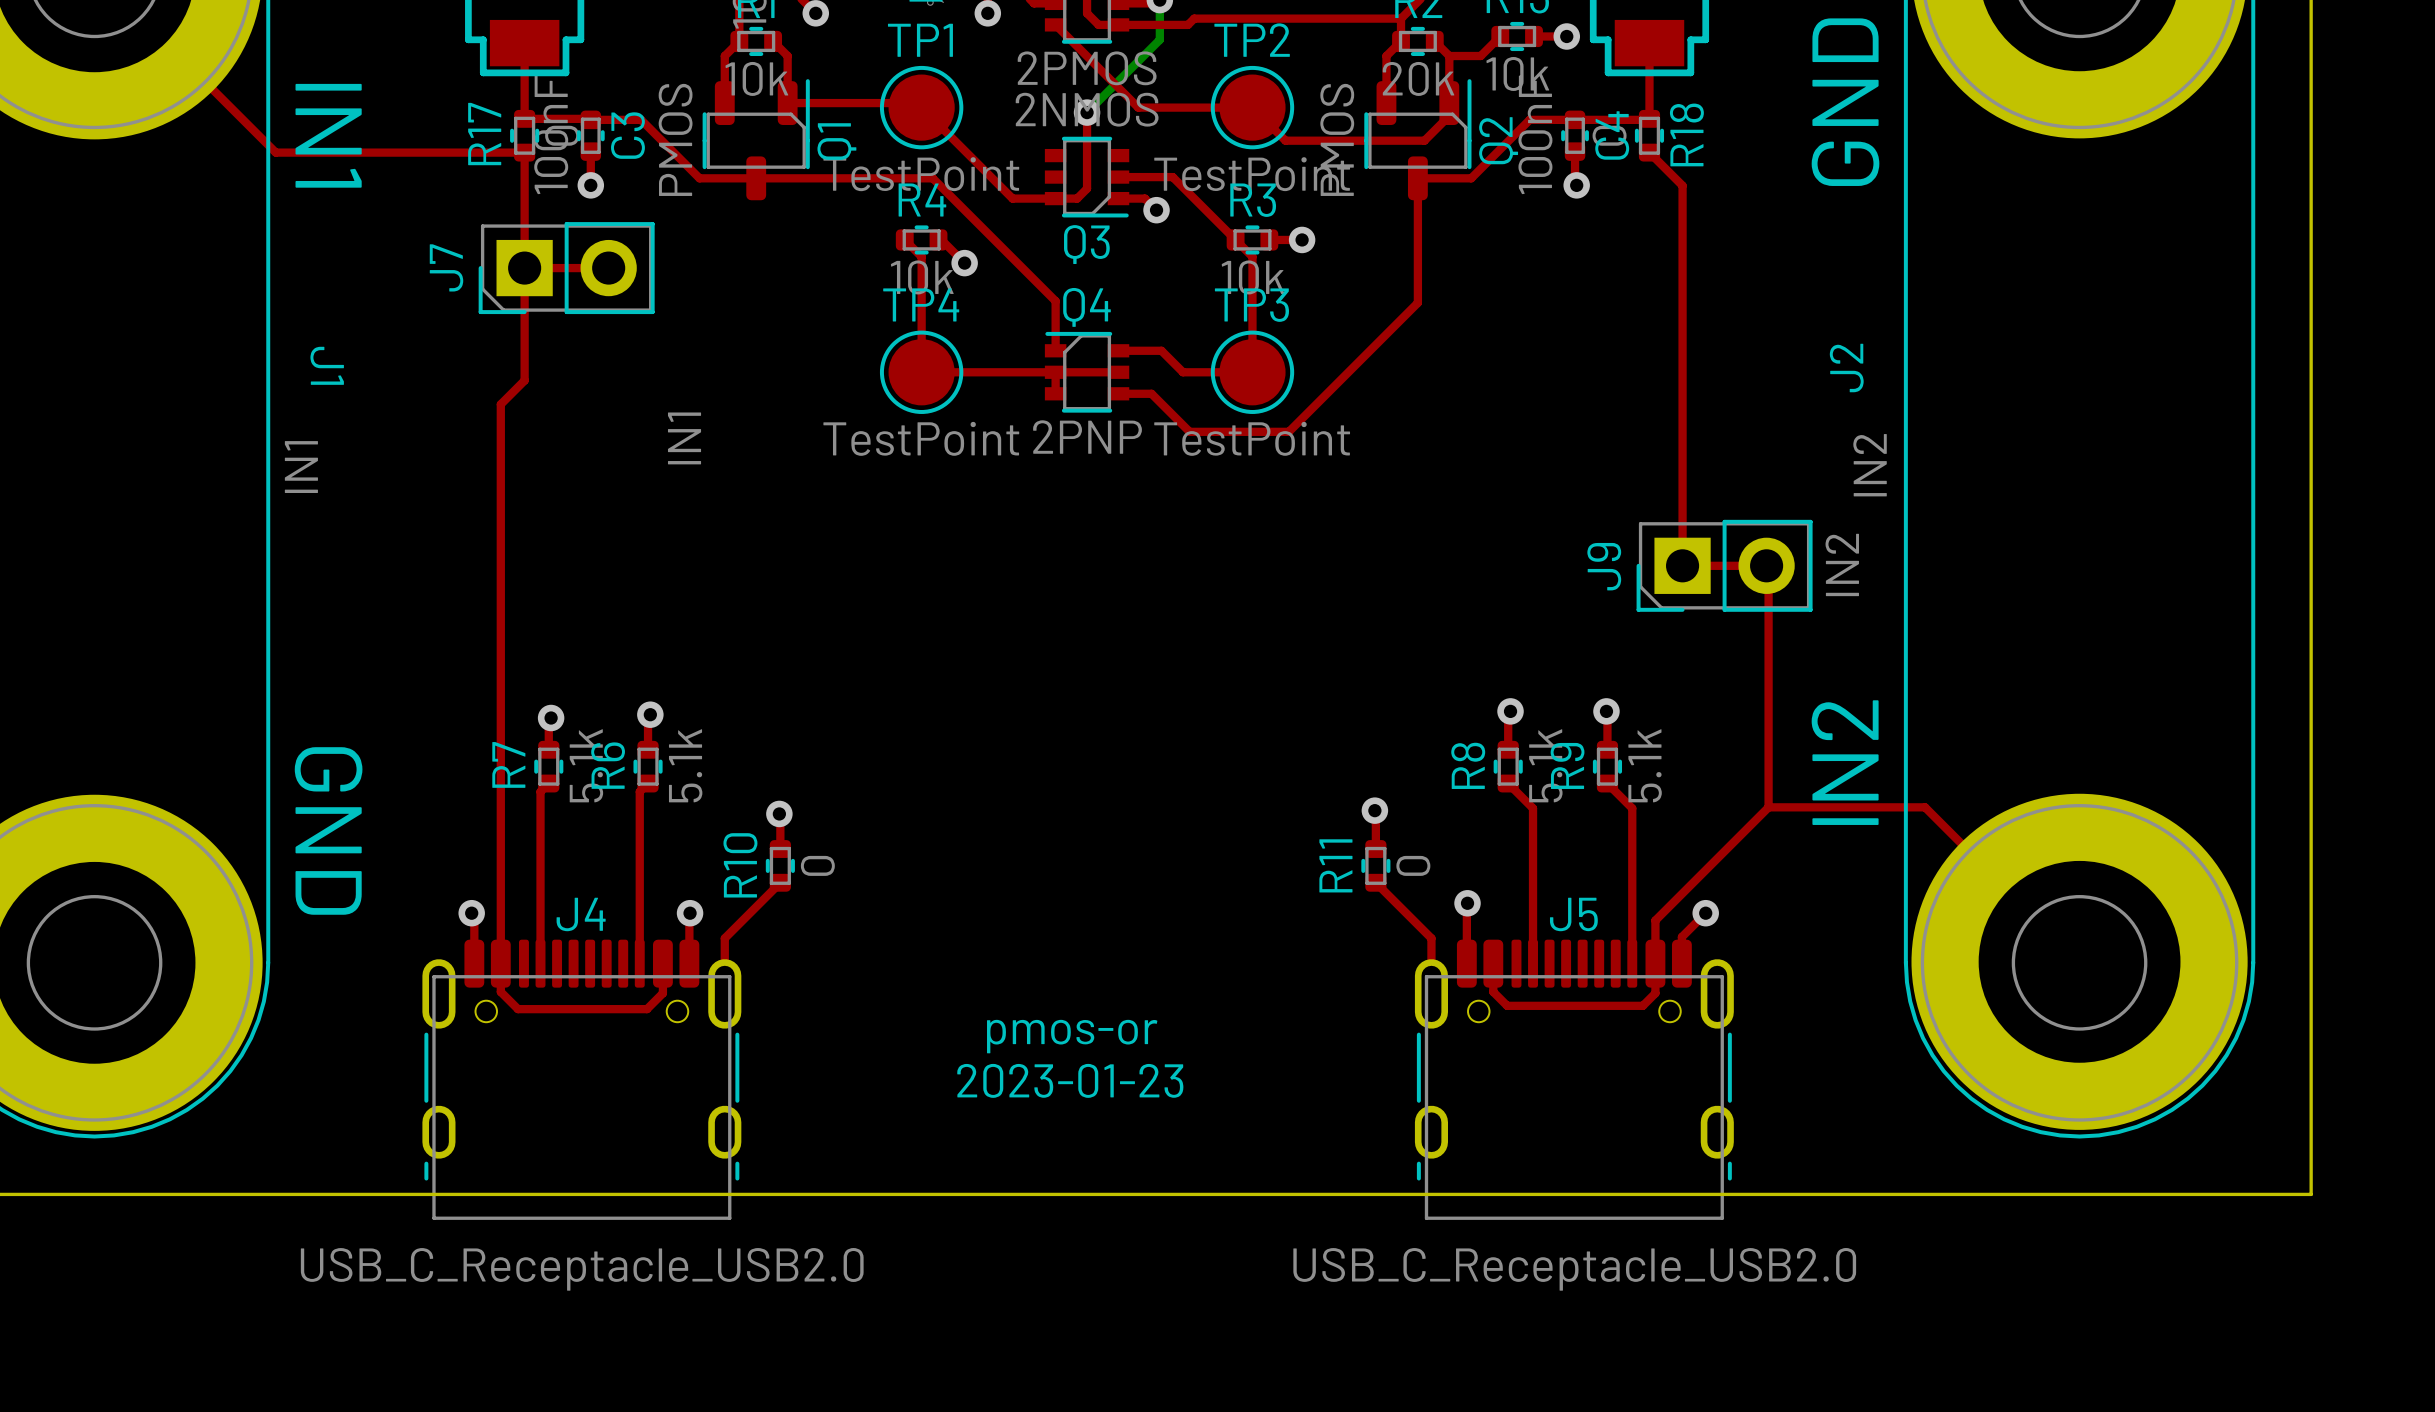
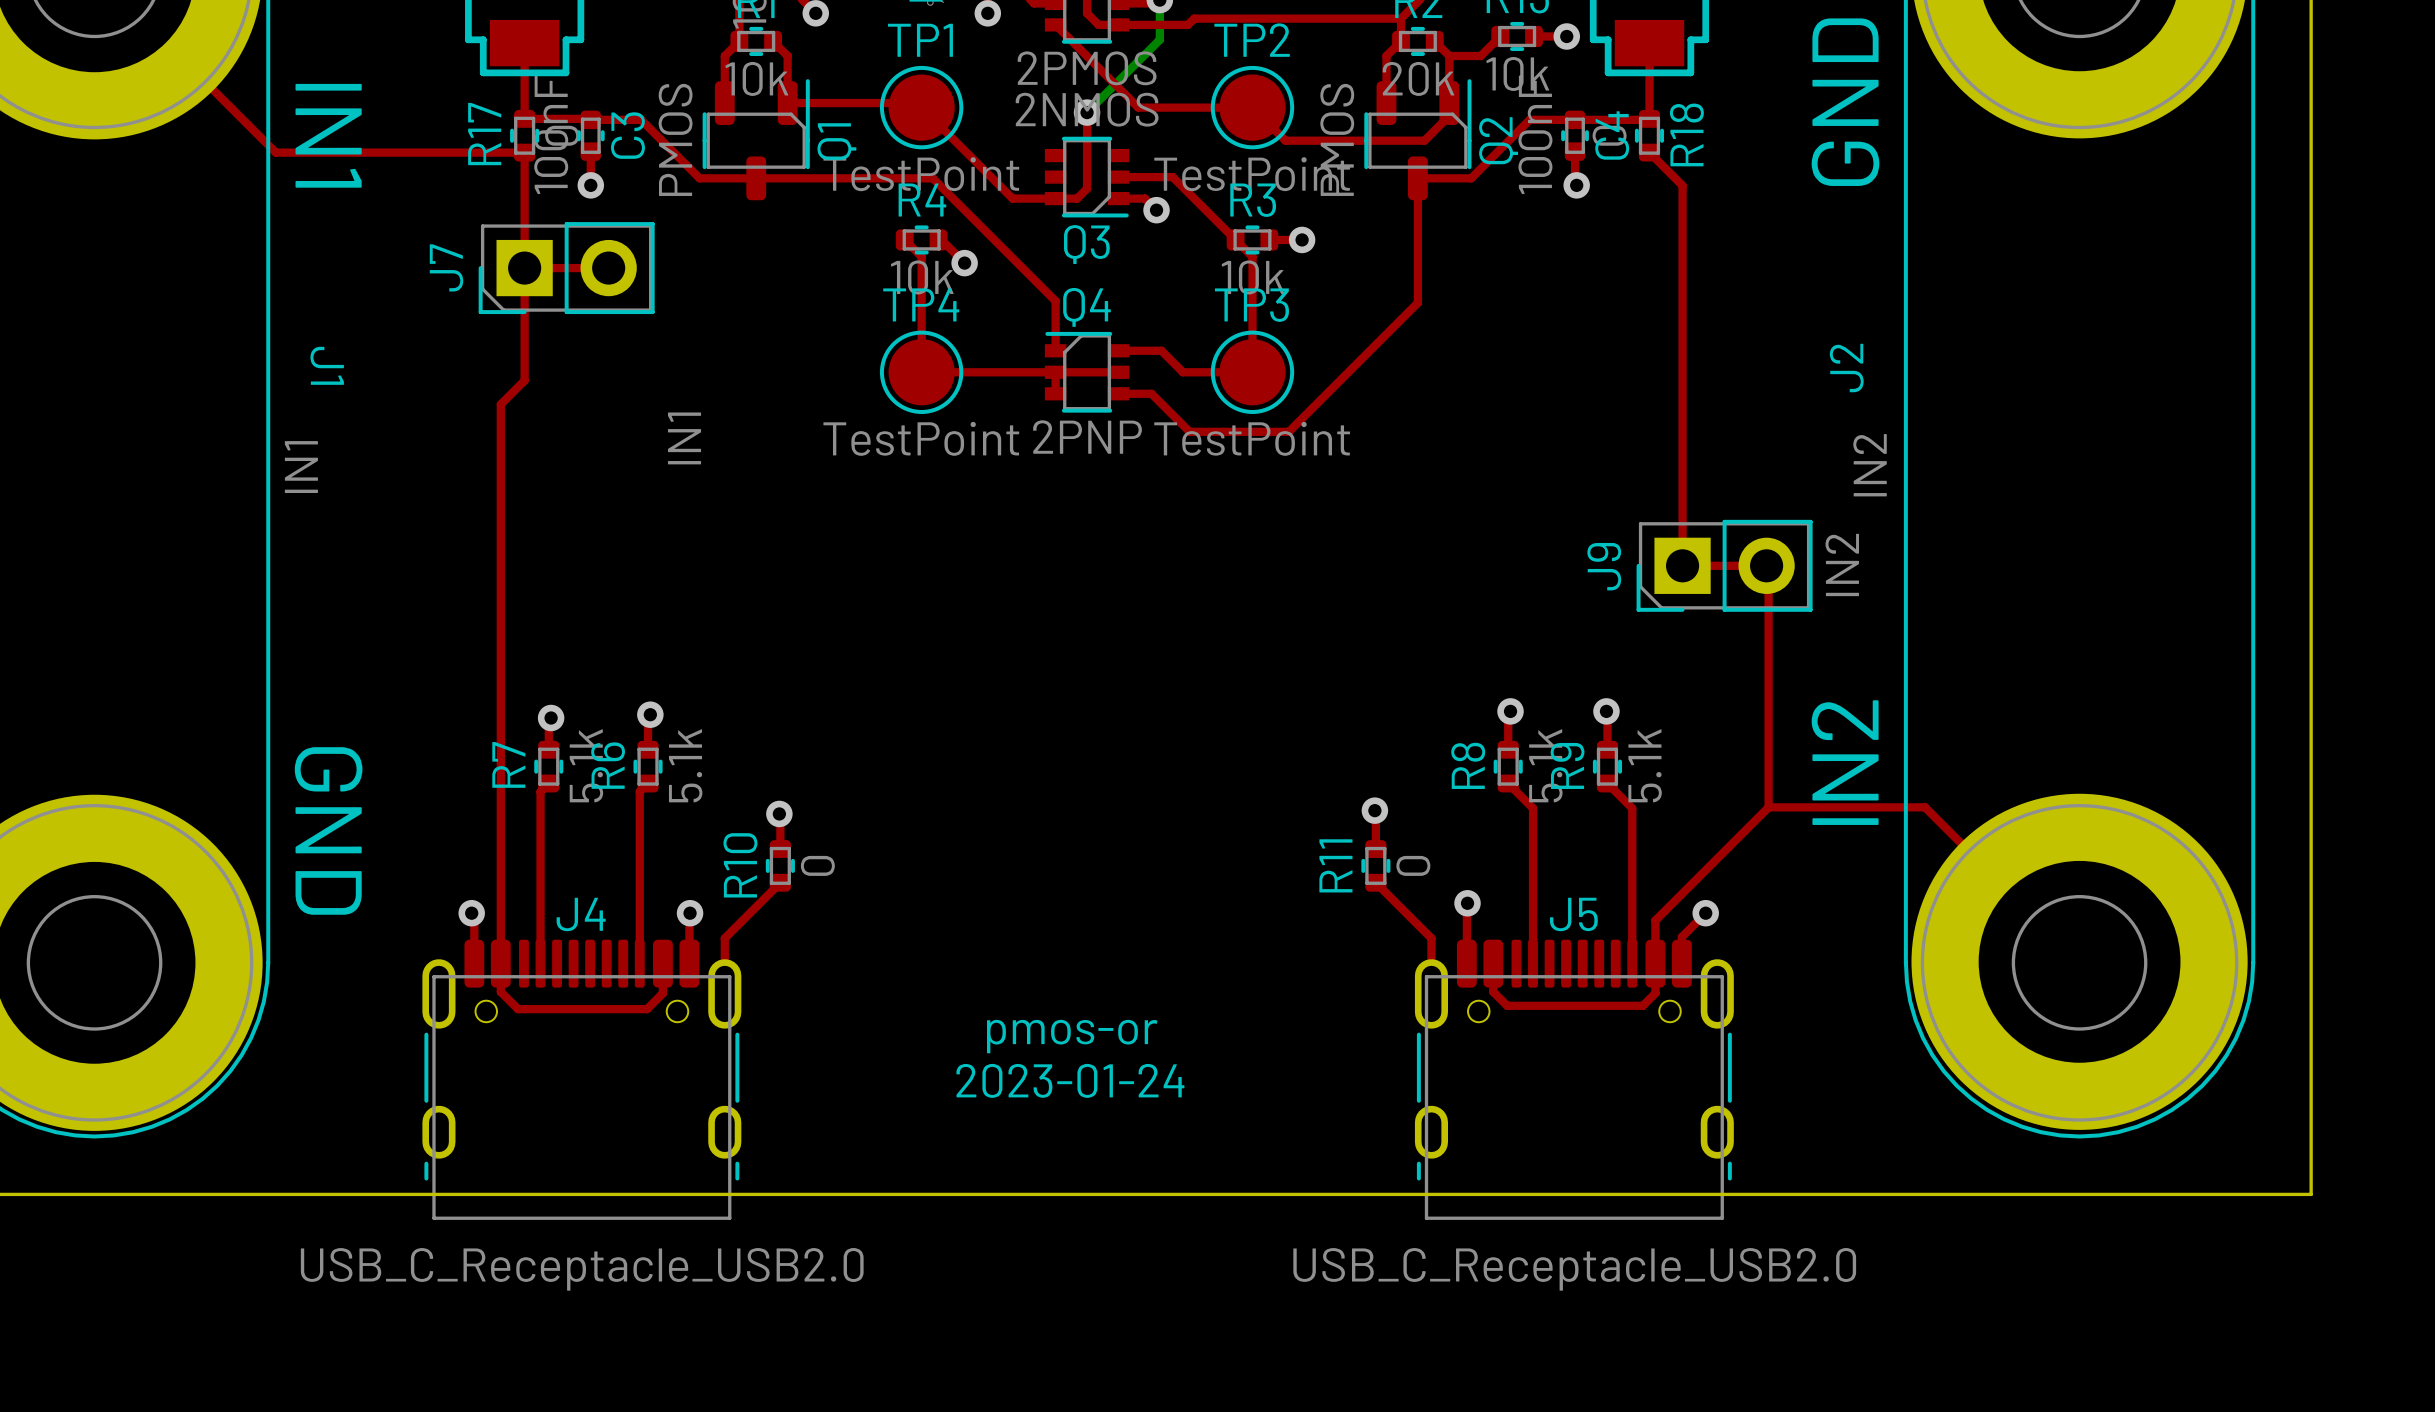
text: 2023-01-23 (1070, 1080) -> 2023-01-24 (1070, 1080)

